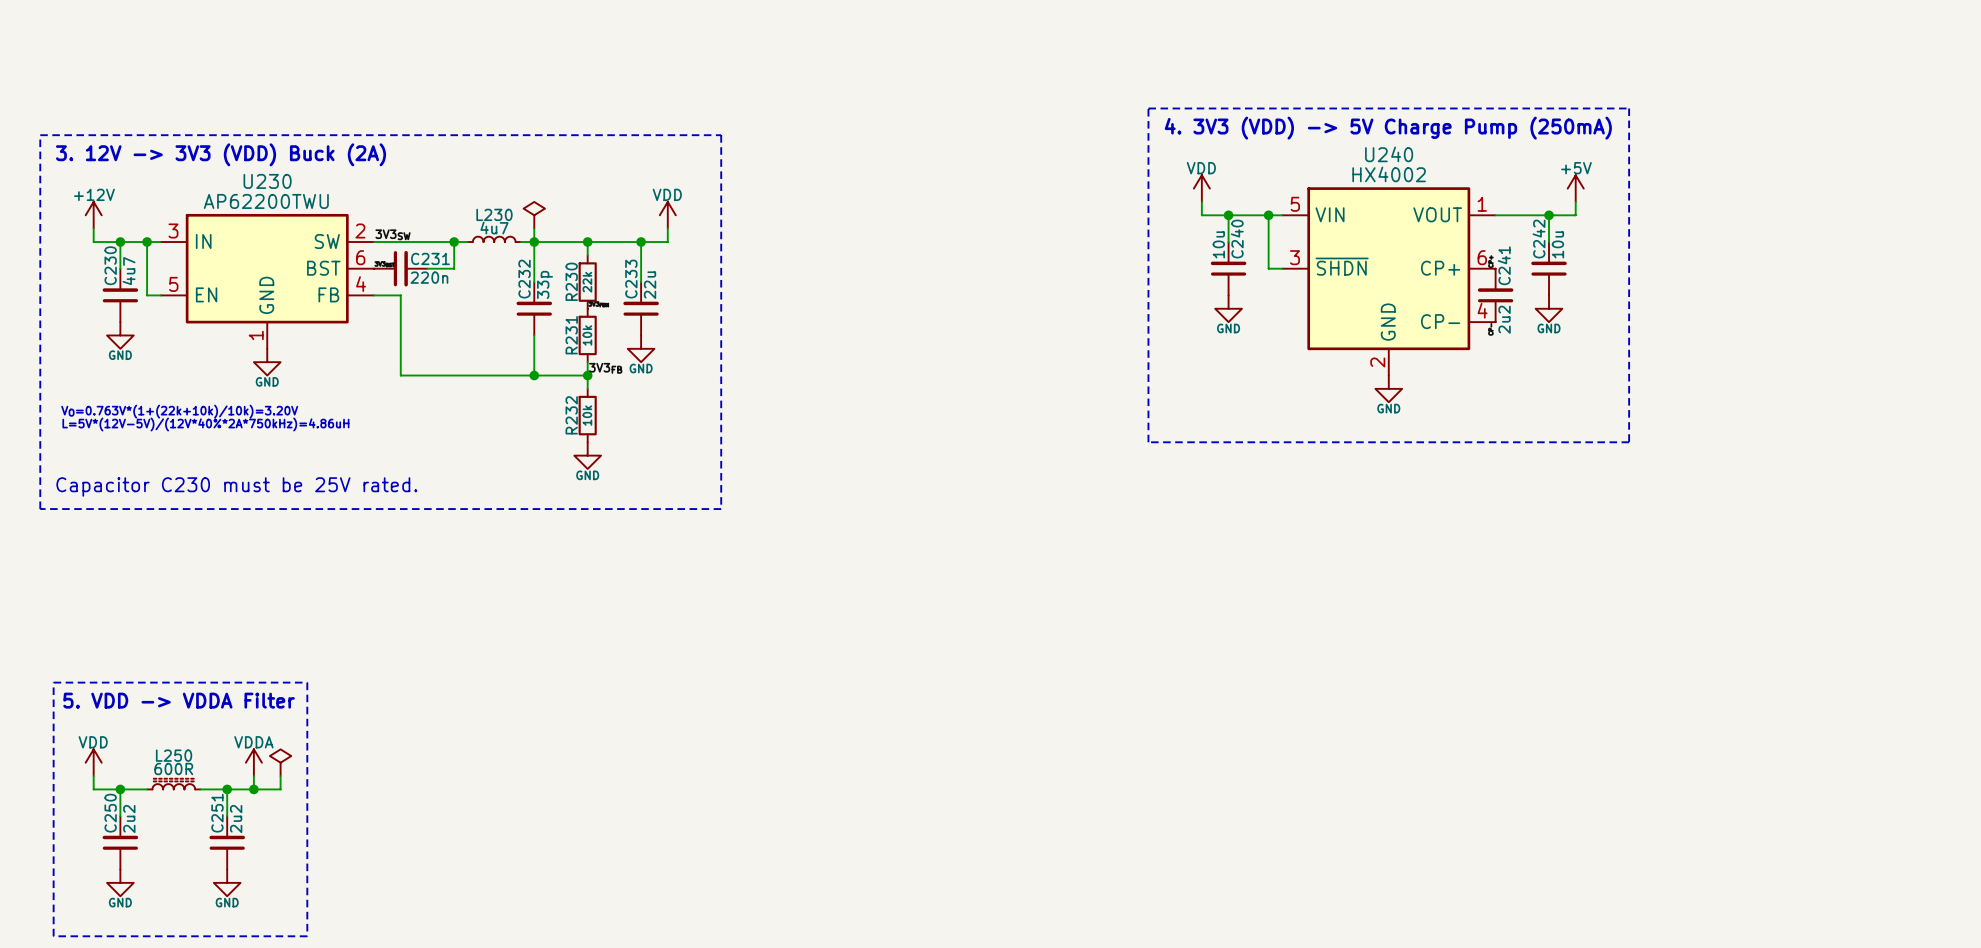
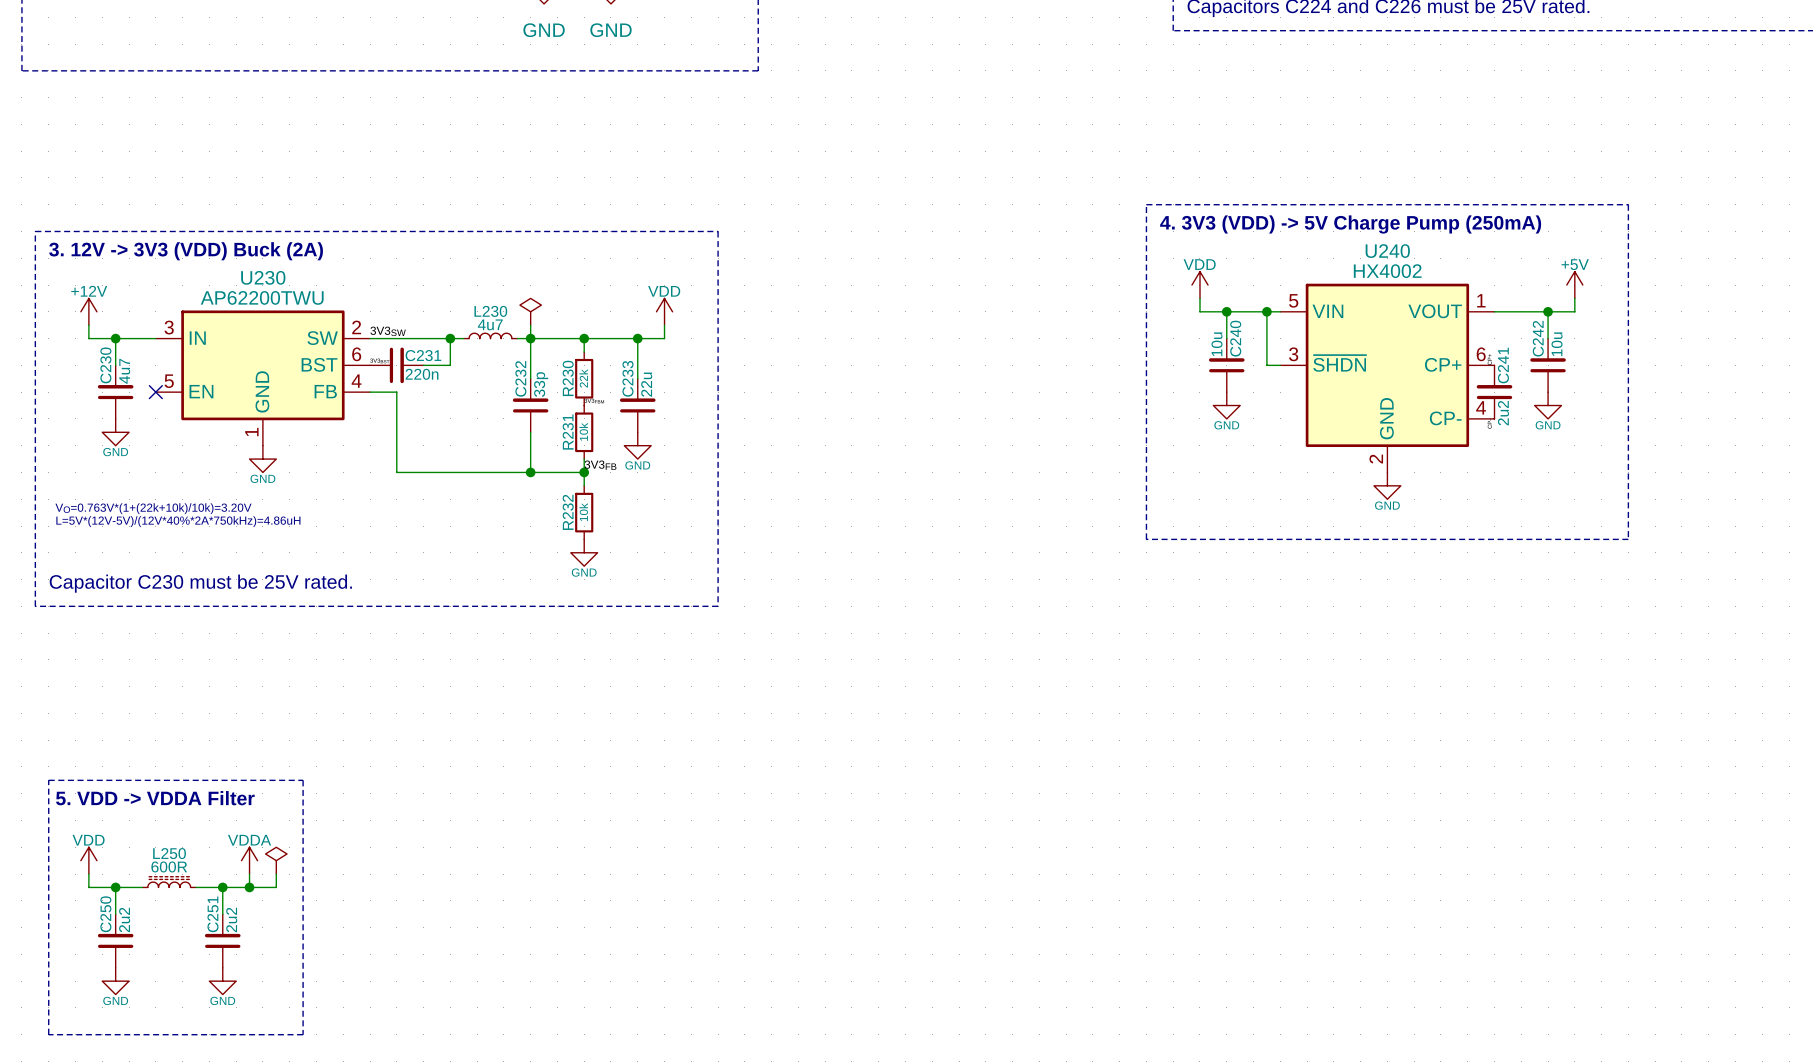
wire: (147, 242) (147, 295) (160, 295) -> none
junction: (147, 242) -> none
no-connect mark: none -> (155, 392)

